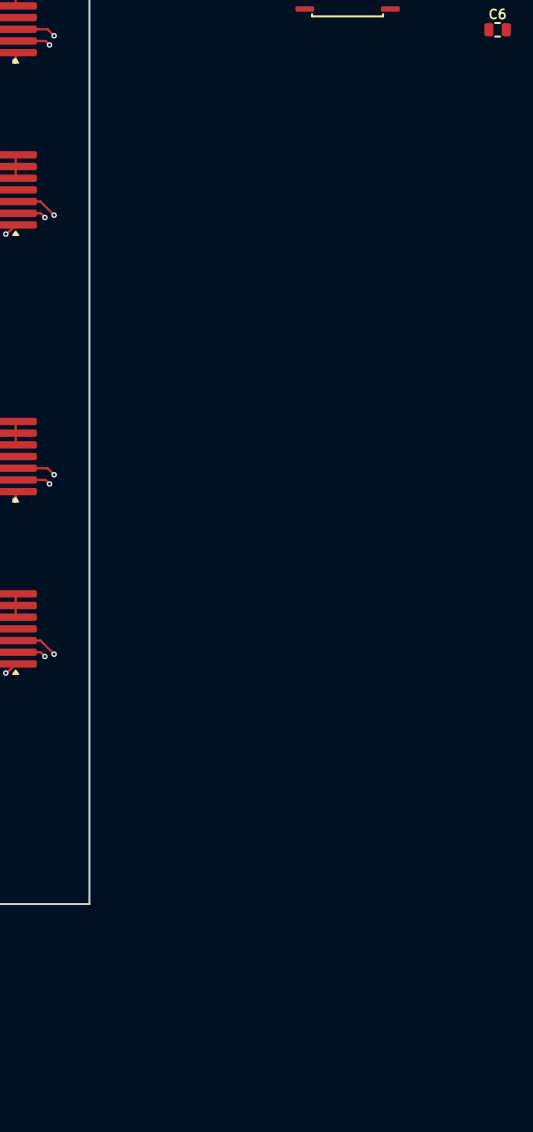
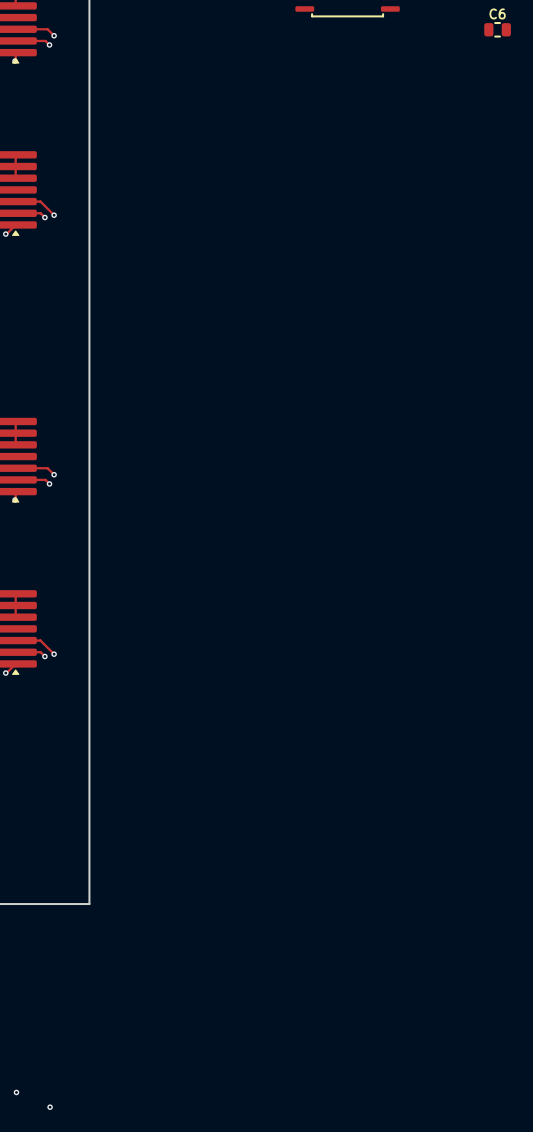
via: none -> (16, 1092)
via: none -> (50, 1107)

